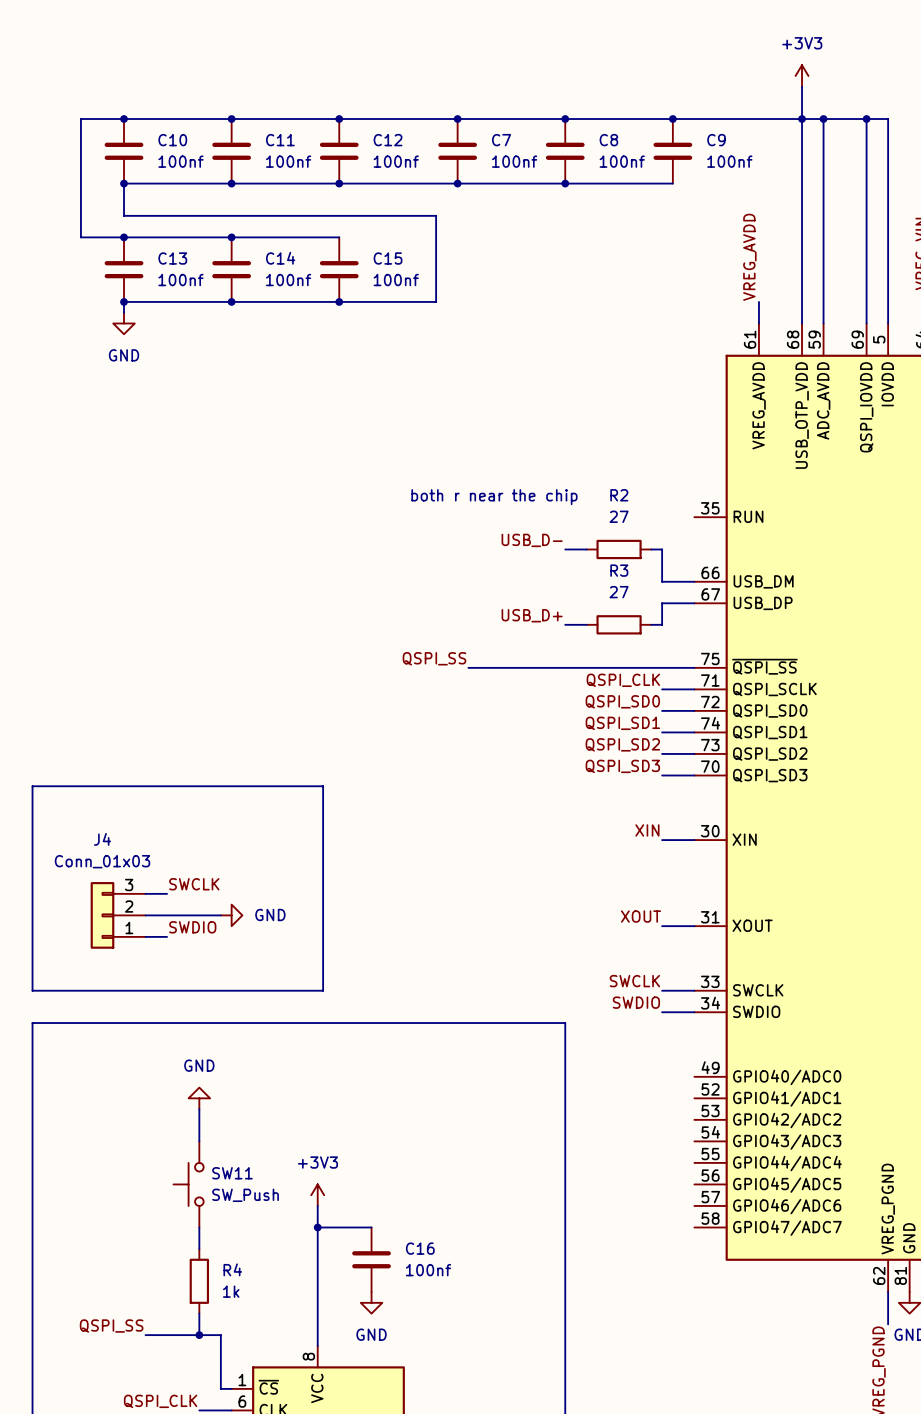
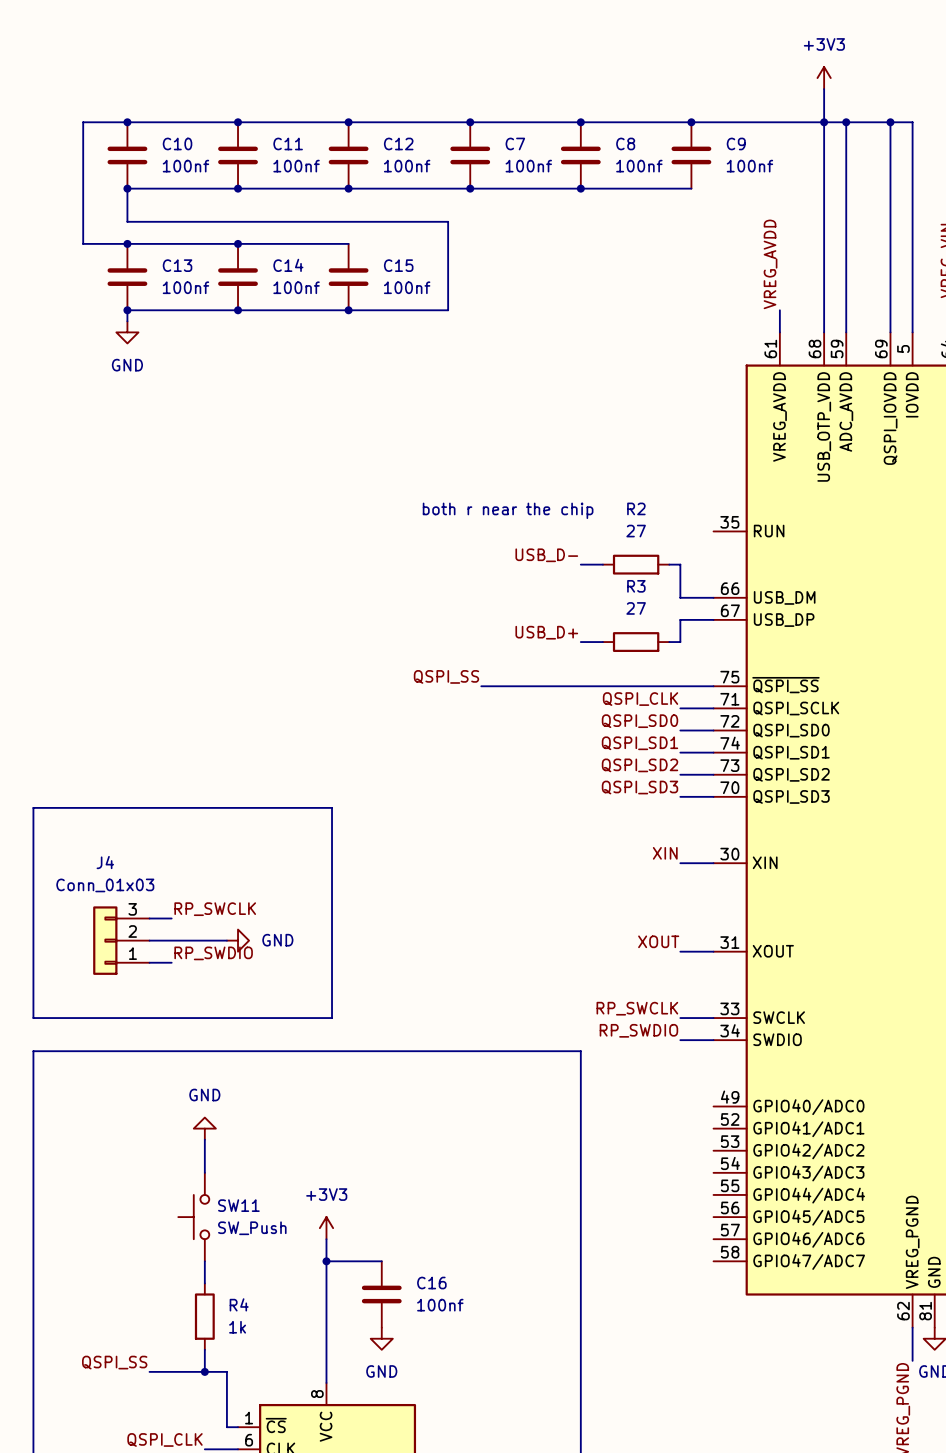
label: SWCLK (194, 884) -> RP_SWCLK (215, 909)
label: SWDIO (192, 927) -> RP_SWDIO (213, 953)
label: SWCLK (634, 981) -> RP_SWCLK (637, 1008)
label: SWDIO (636, 1002) -> RP_SWDIO (638, 1030)

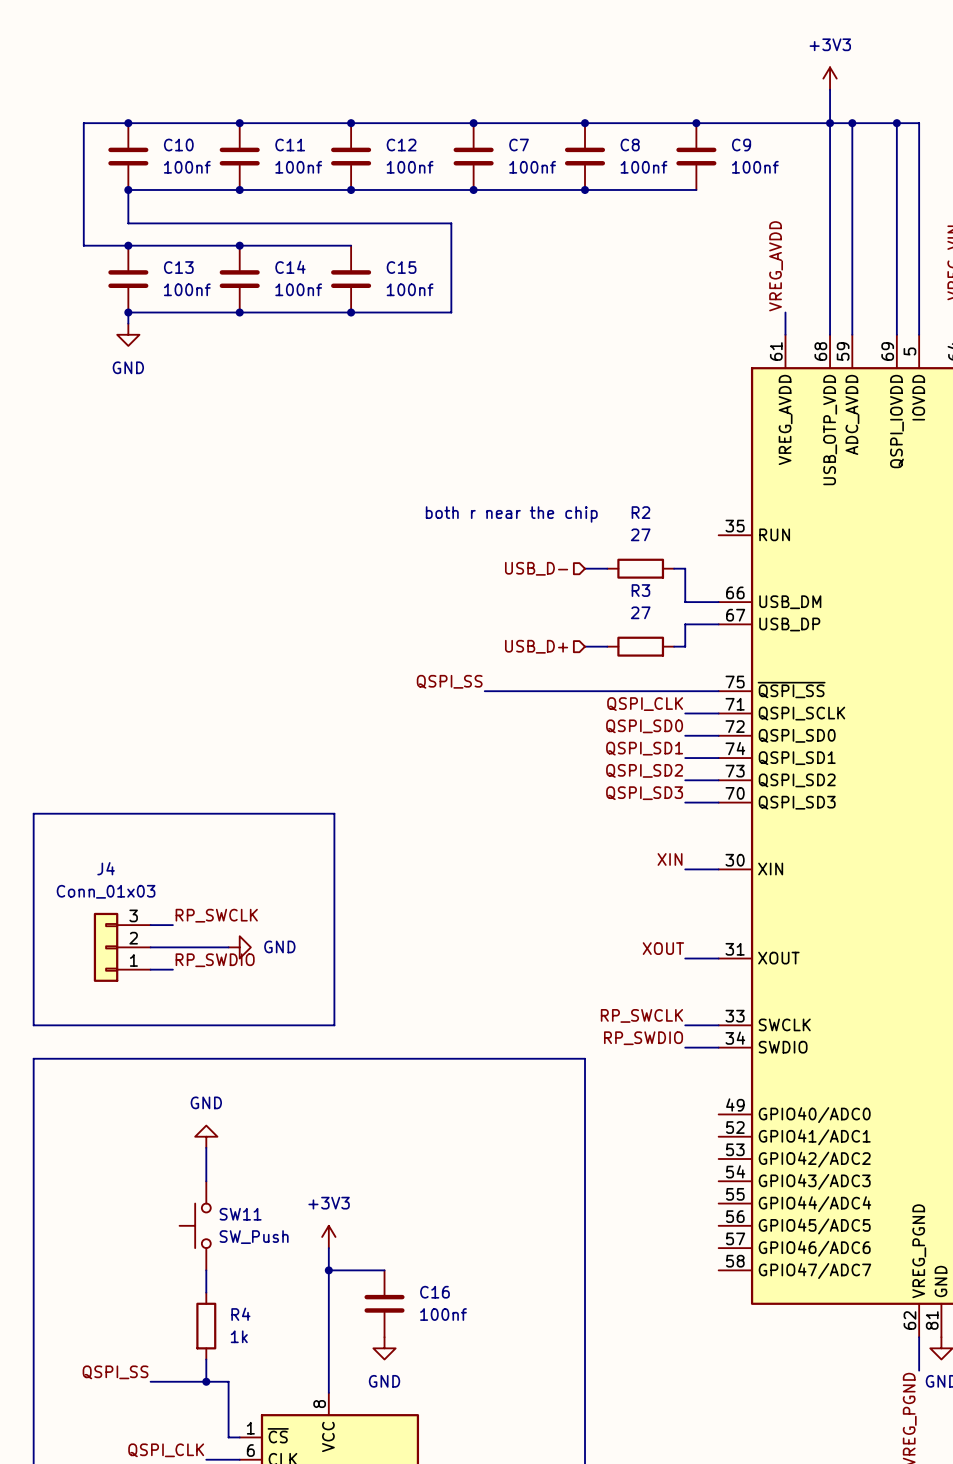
label: USB_D- (546, 555) -> none
hierarchical label: none -> USB_D- (536, 568)
label: USB_D+ (546, 632) -> none
hierarchical label: none -> USB_D+ (536, 646)

